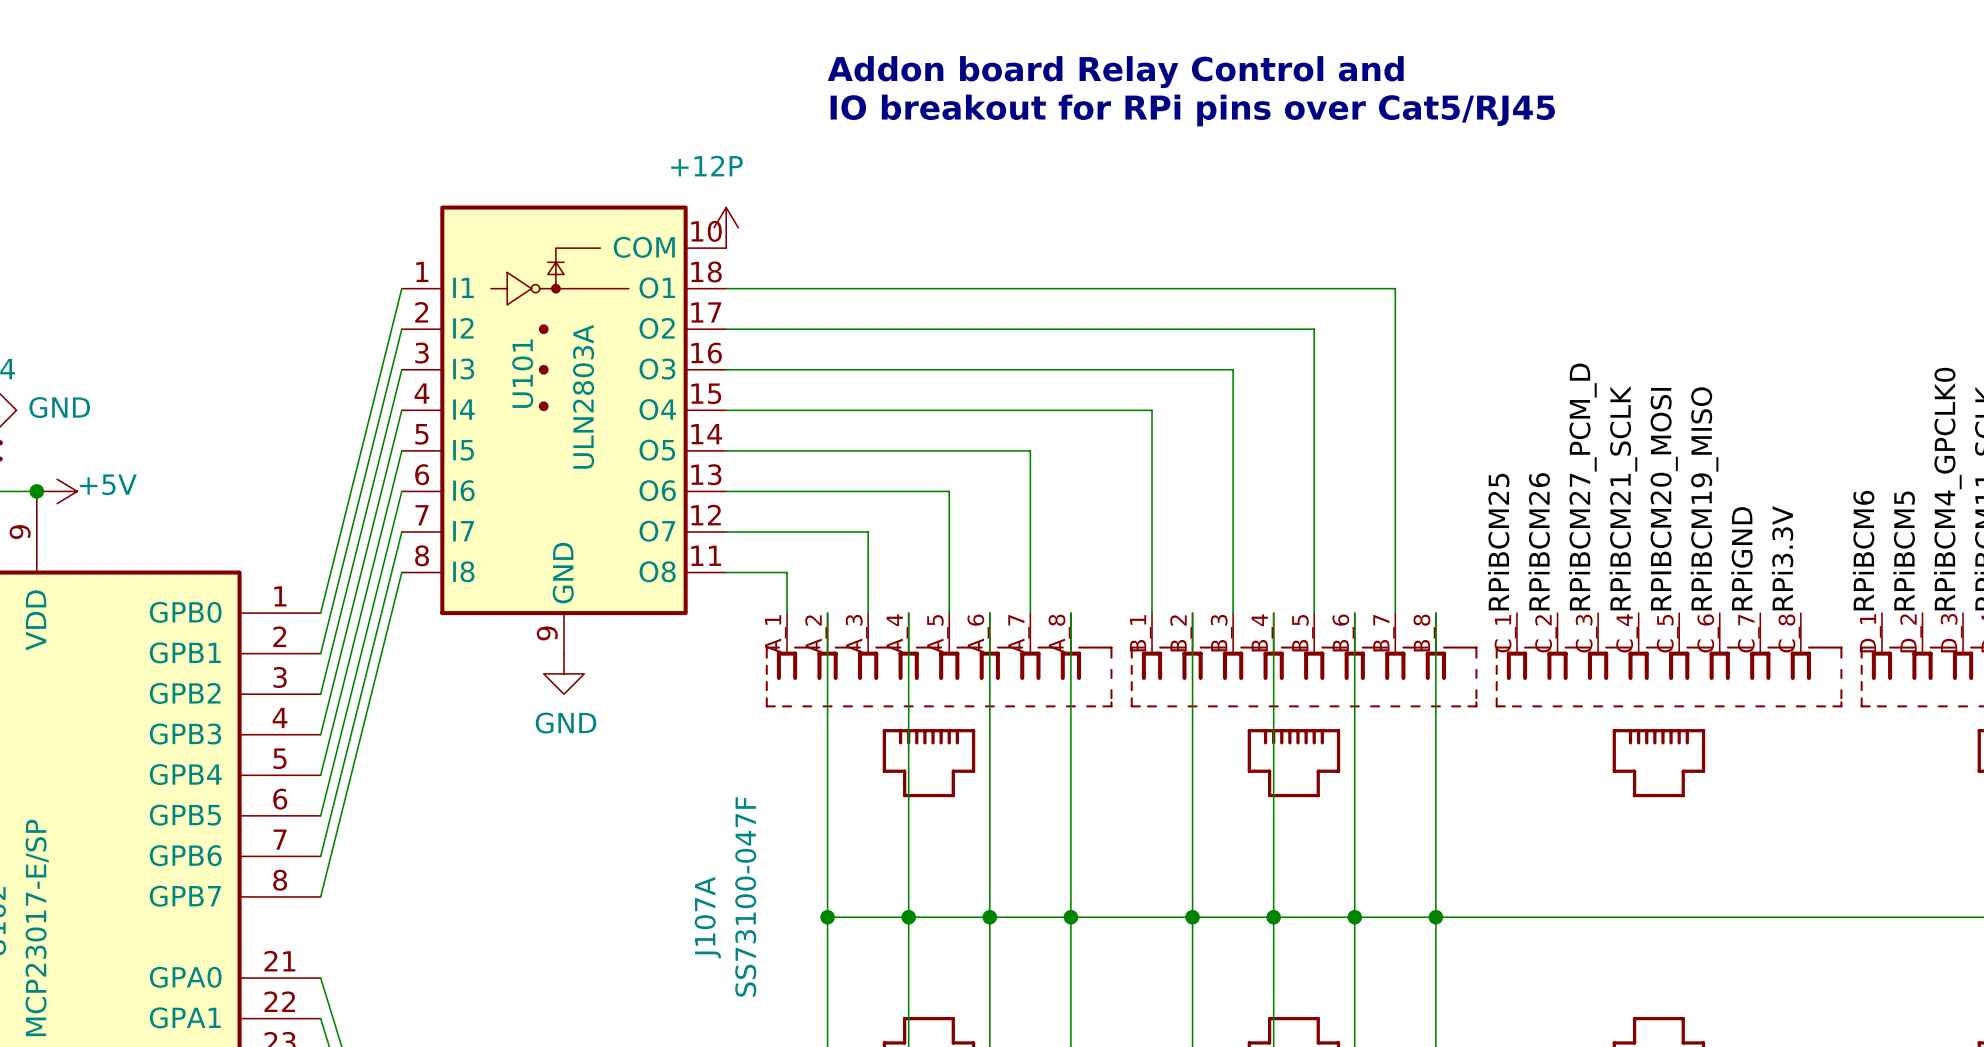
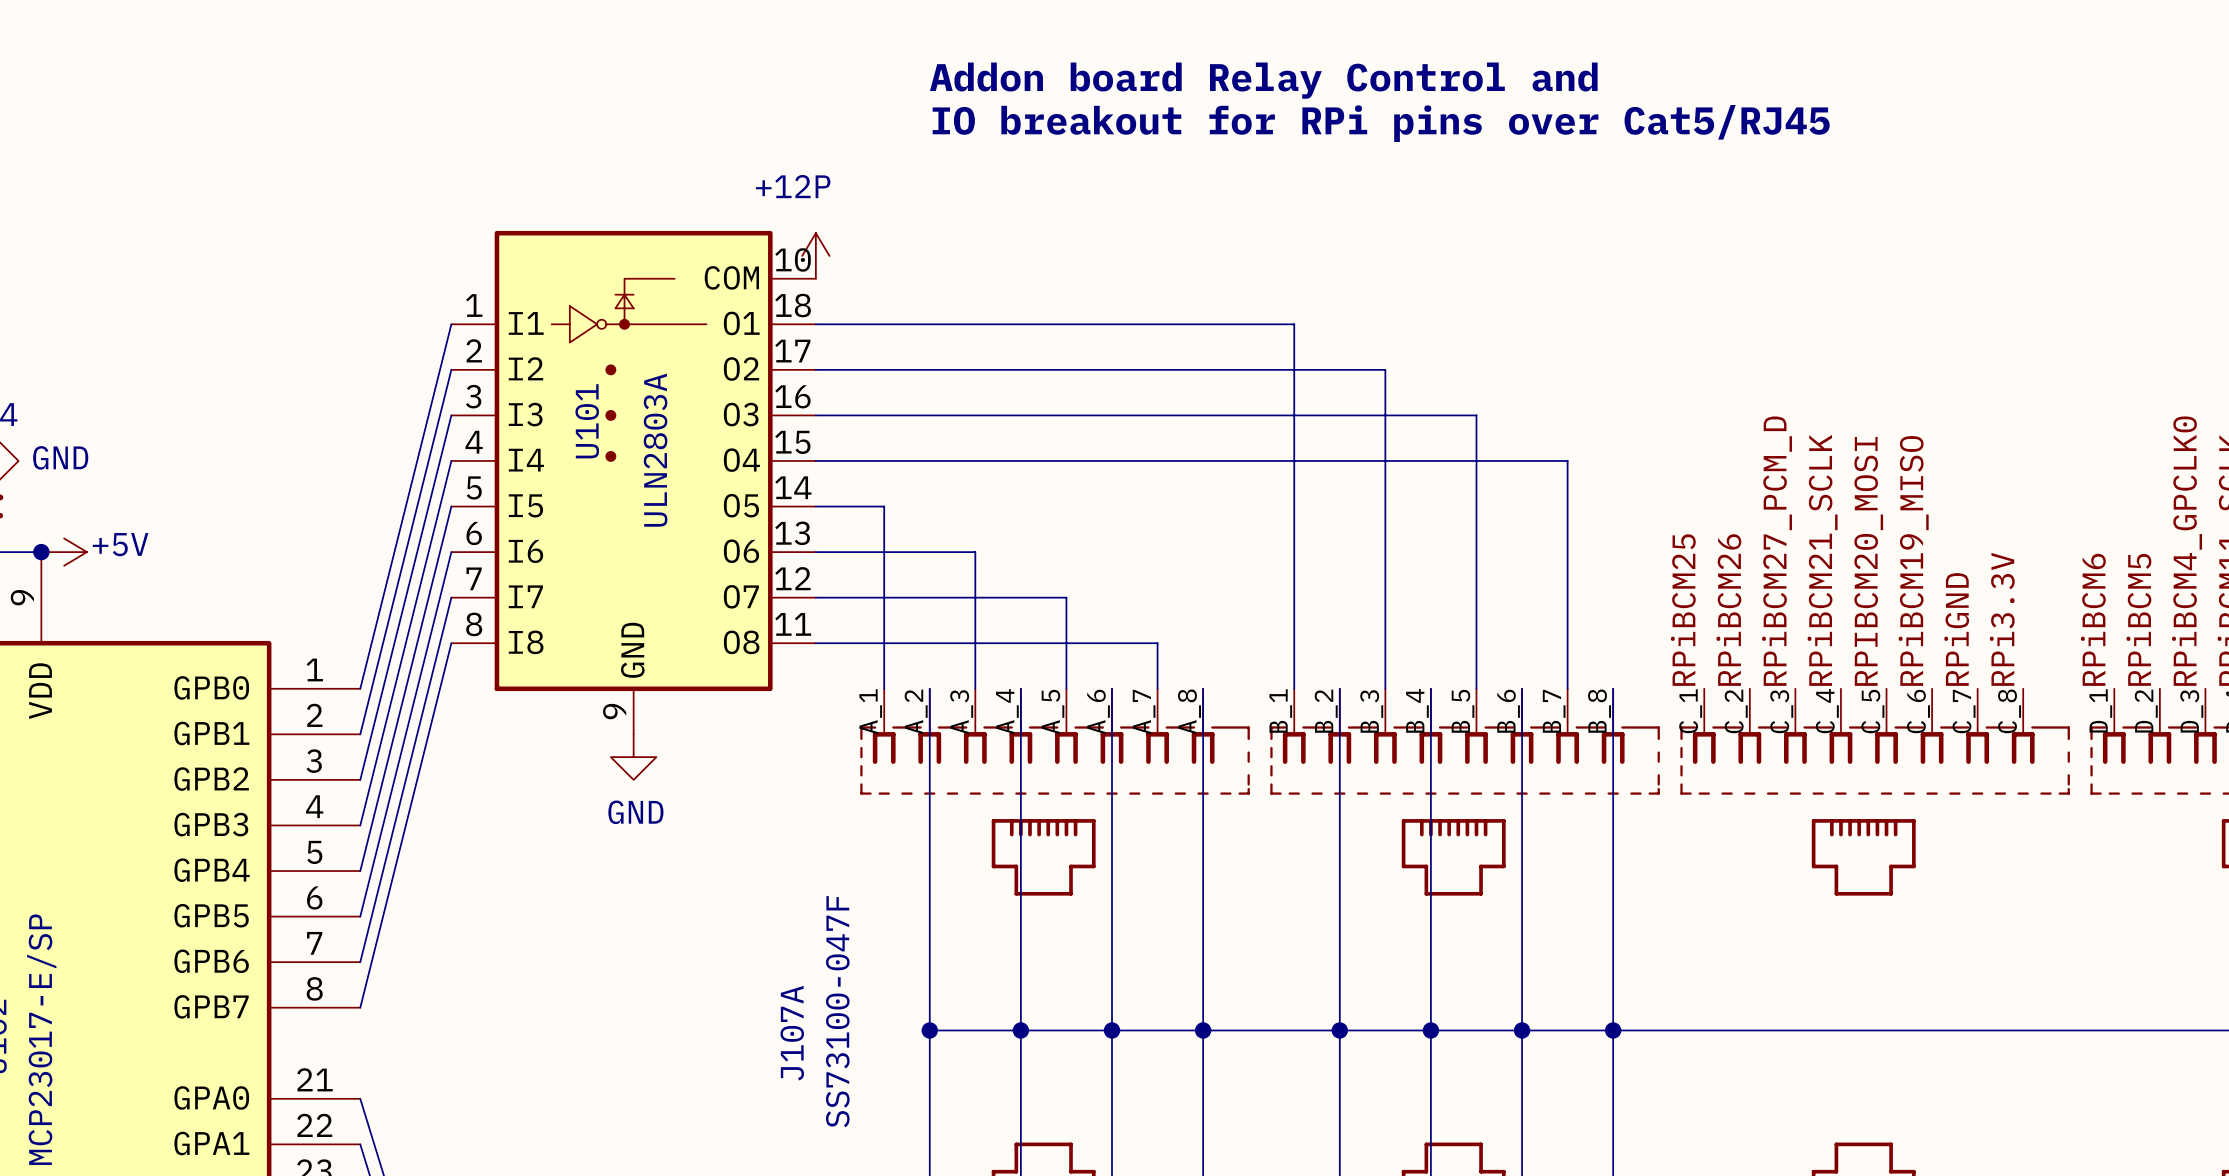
wire: (1152, 288) (1395, 288) (1395, 410) -> (1294, 324) (1294, 460) (1567, 460)
wire: (1233, 329) (1314, 329) (1314, 369) -> (1385, 369) (1385, 415) (1476, 415)
wire: (787, 450) (1030, 450) (1030, 572) -> (884, 506) (884, 643) (1157, 643)
wire: (868, 491) (949, 491) (949, 531) -> (975, 552) (975, 597) (1066, 597)

